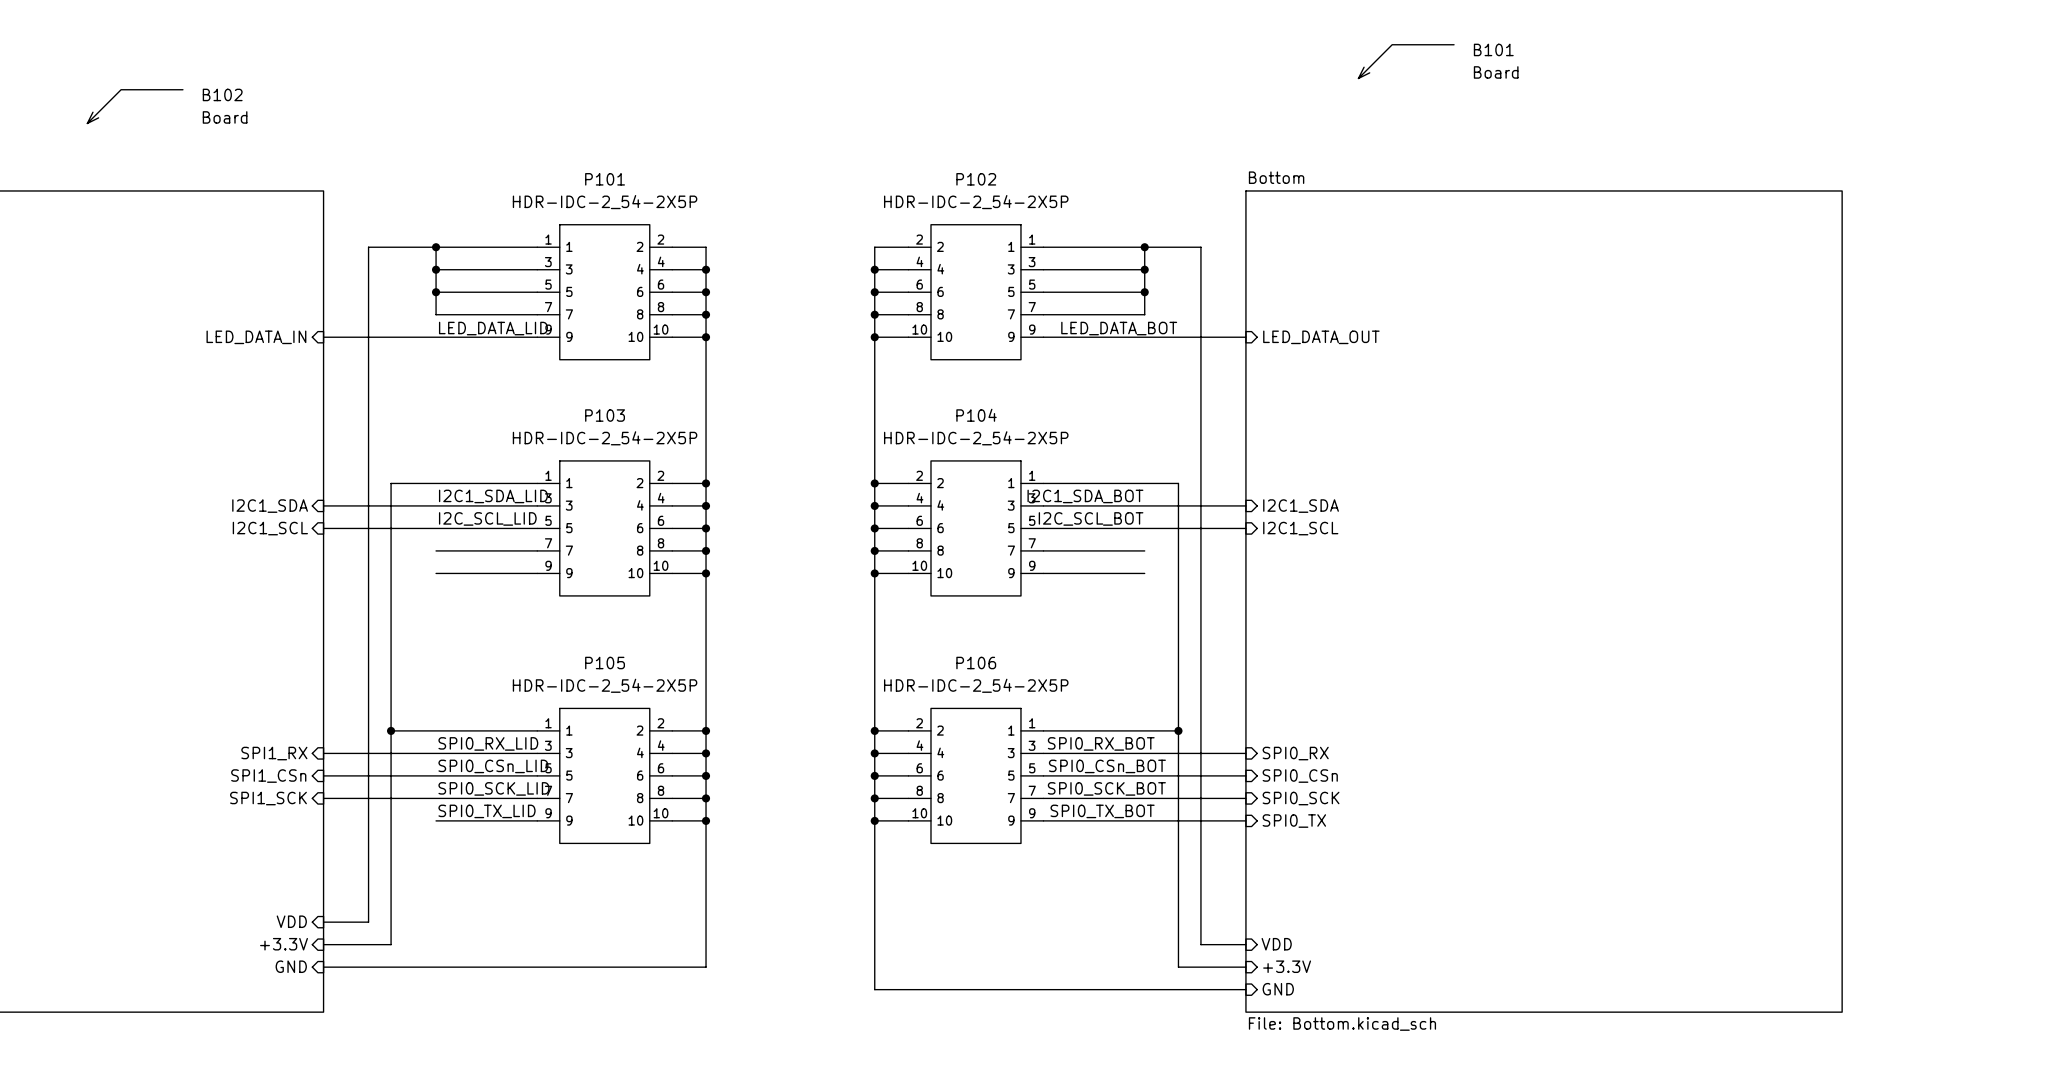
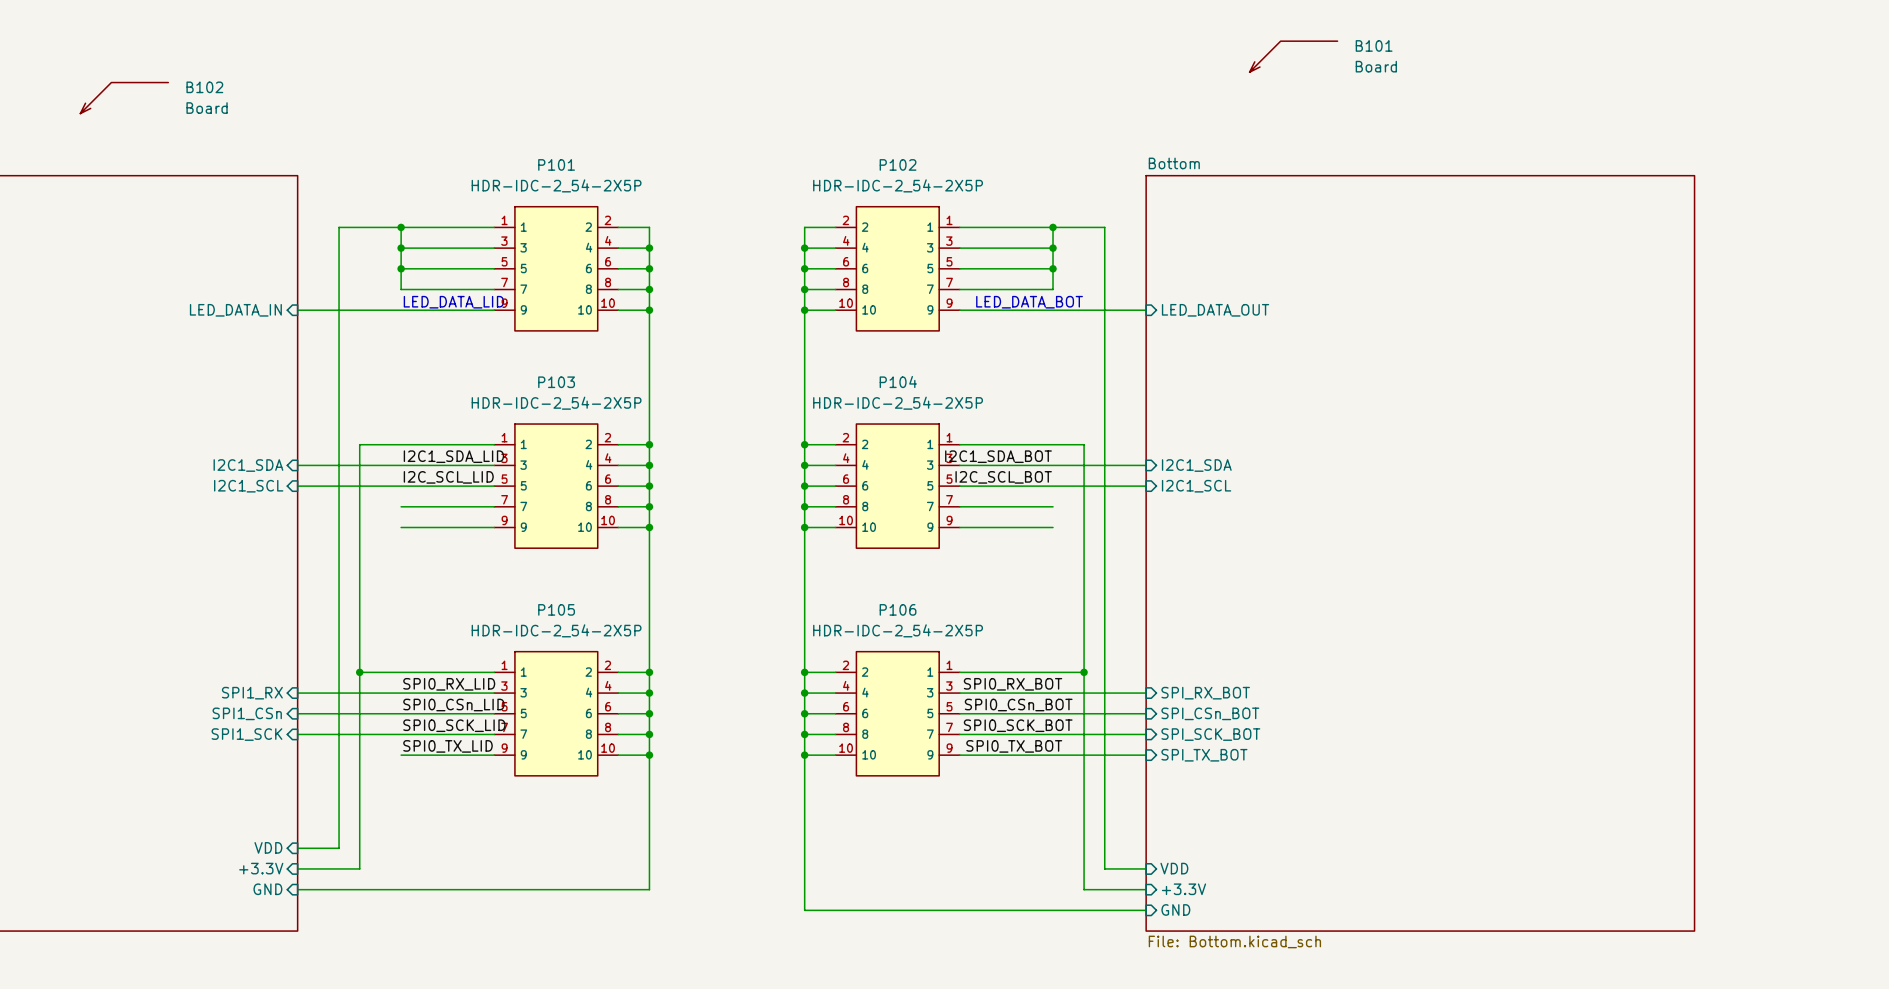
sheet pin: SPI0_RX (1295, 753) -> SPI_RX_BOT (1205, 693)
sheet pin: SPI0_CSn (1300, 776) -> SPI_CSn_BOT (1210, 713)
sheet pin: SPI0_SCK (1301, 798) -> SPI_SCK_BOT (1210, 734)
sheet pin: SPI0_TX (1294, 821) -> SPI_TX_BOT (1204, 755)

